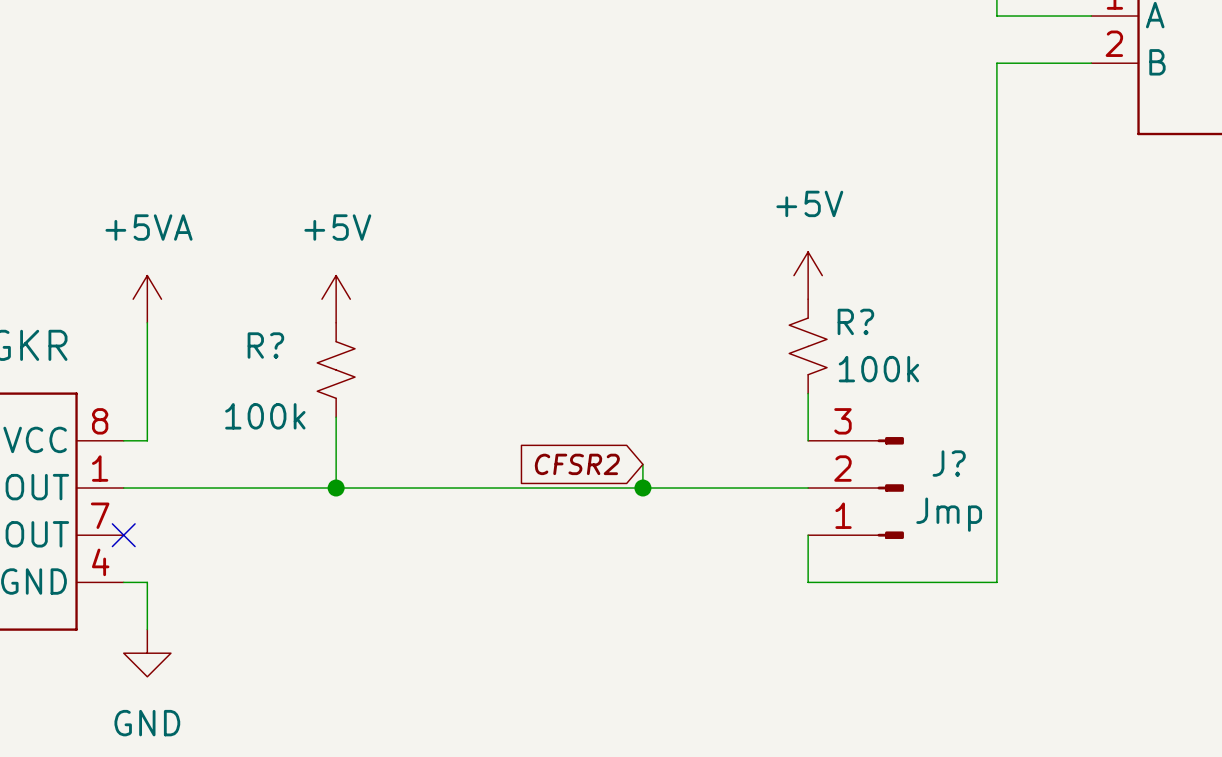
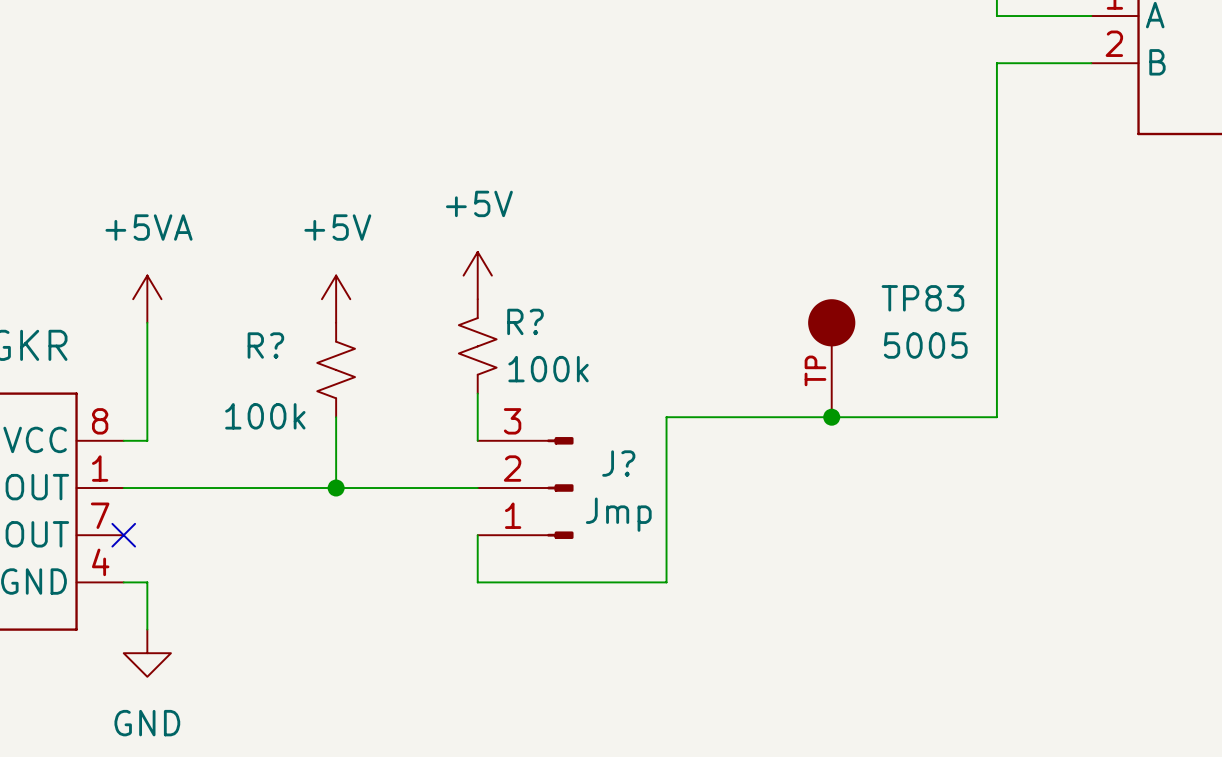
power symbol position: +5V (808, 275) -> +5V (477, 275)
R? position: (808, 346) -> (477, 346)
TP83: none -> 5005 (831, 358)
wire: (808, 393) (808, 440) -> (477, 393) (477, 440)
junction: none -> (831, 417)
wire: (996, 417) (996, 582) (808, 582) (808, 535) -> (996, 417) (666, 417) (666, 582) (477, 582) (477, 535)
global label: CFSR2 (577, 464) -> none
wire: (642, 464) (642, 488) -> none
wire: (477, 488) (808, 488) -> none
junction: (642, 488) -> none
J? position: (856, 488) -> (525, 488)

